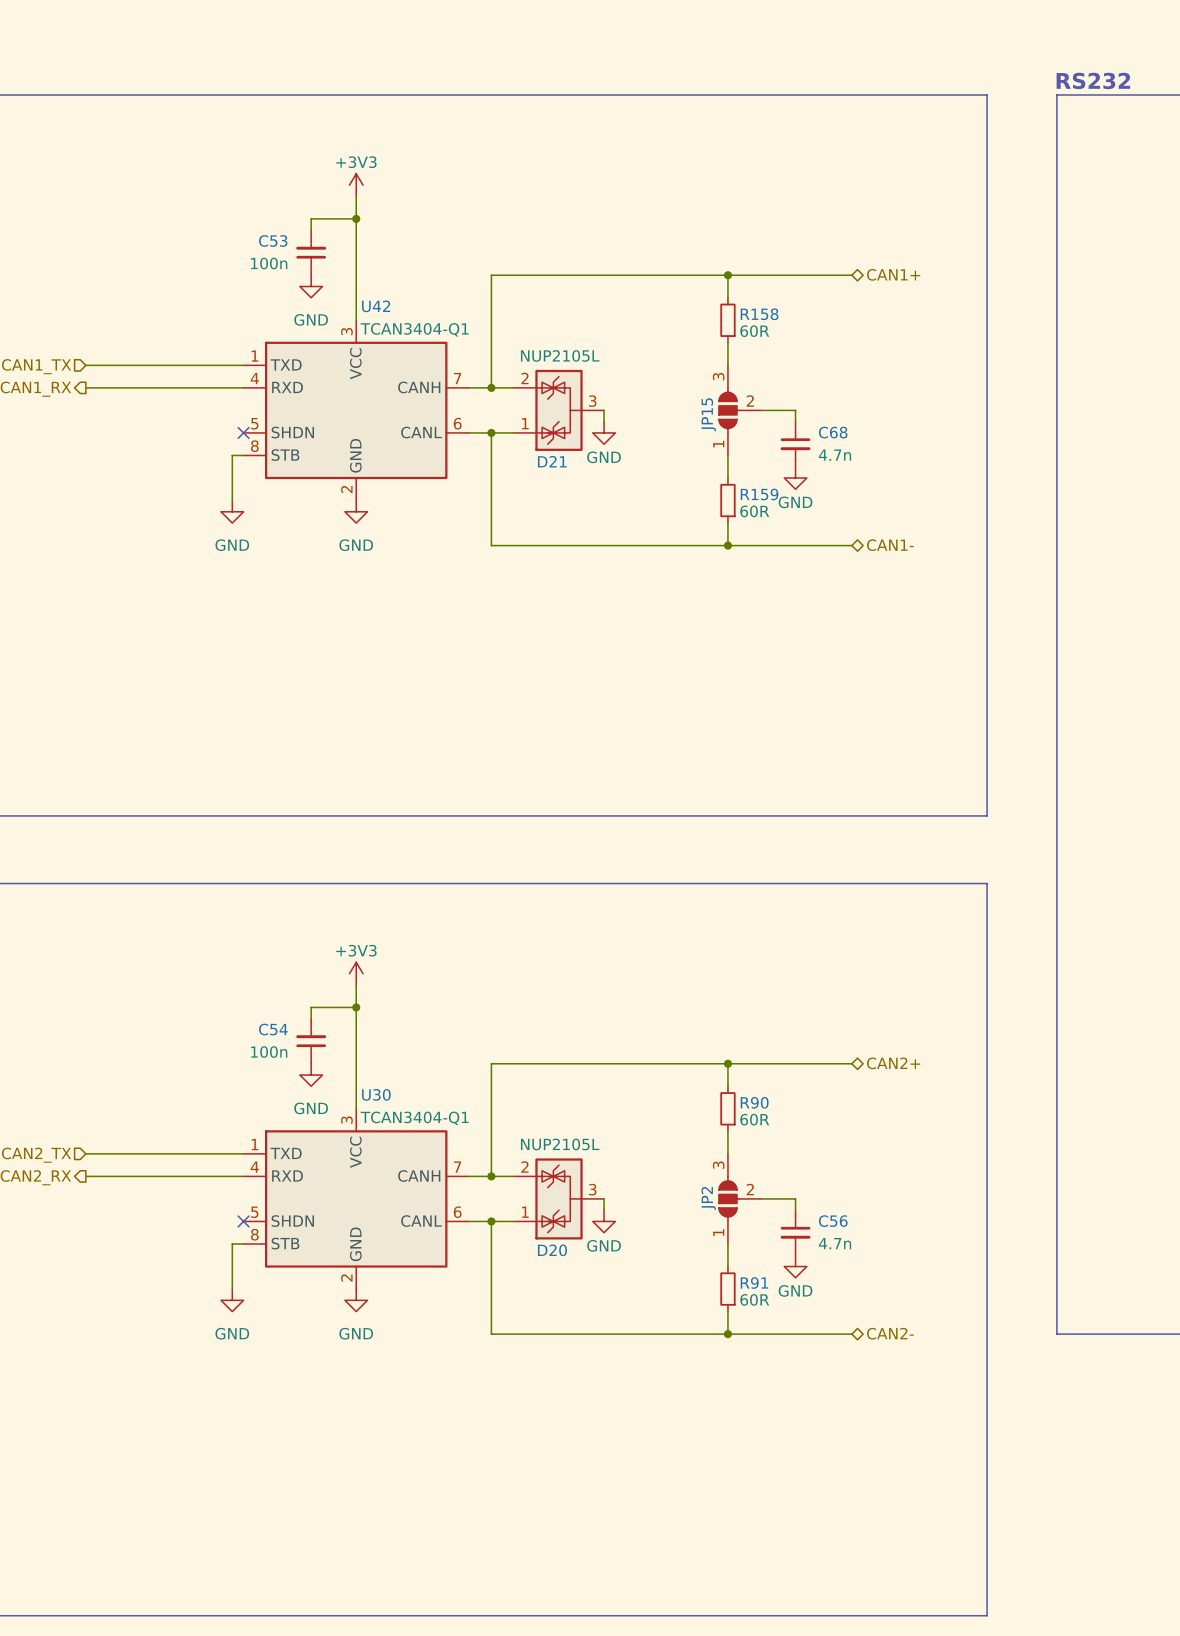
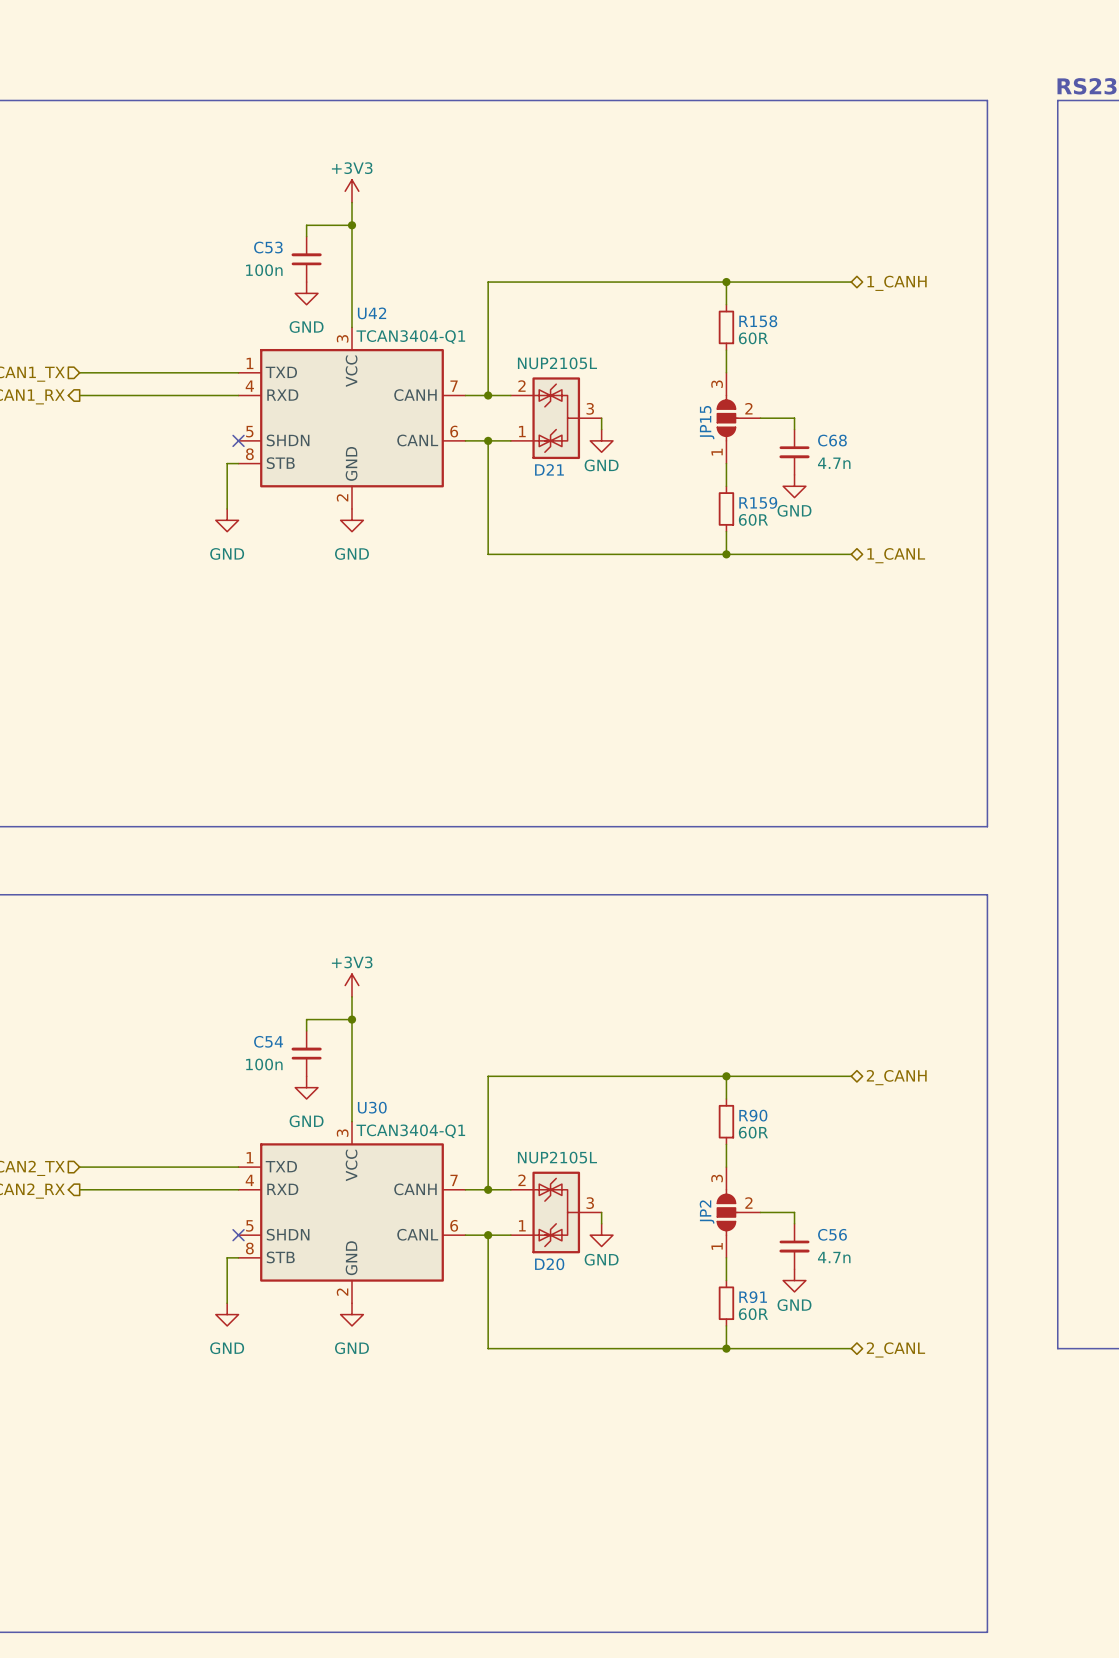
hierarchical label: CAN1+ (893, 274) -> 1_CANH (897, 283)
hierarchical label: CAN1- (890, 545) -> 1_CANL (896, 555)
hierarchical label: CAN2+ (893, 1063) -> 2_CANH (896, 1077)
hierarchical label: CAN2- (890, 1333) -> 2_CANL (895, 1349)

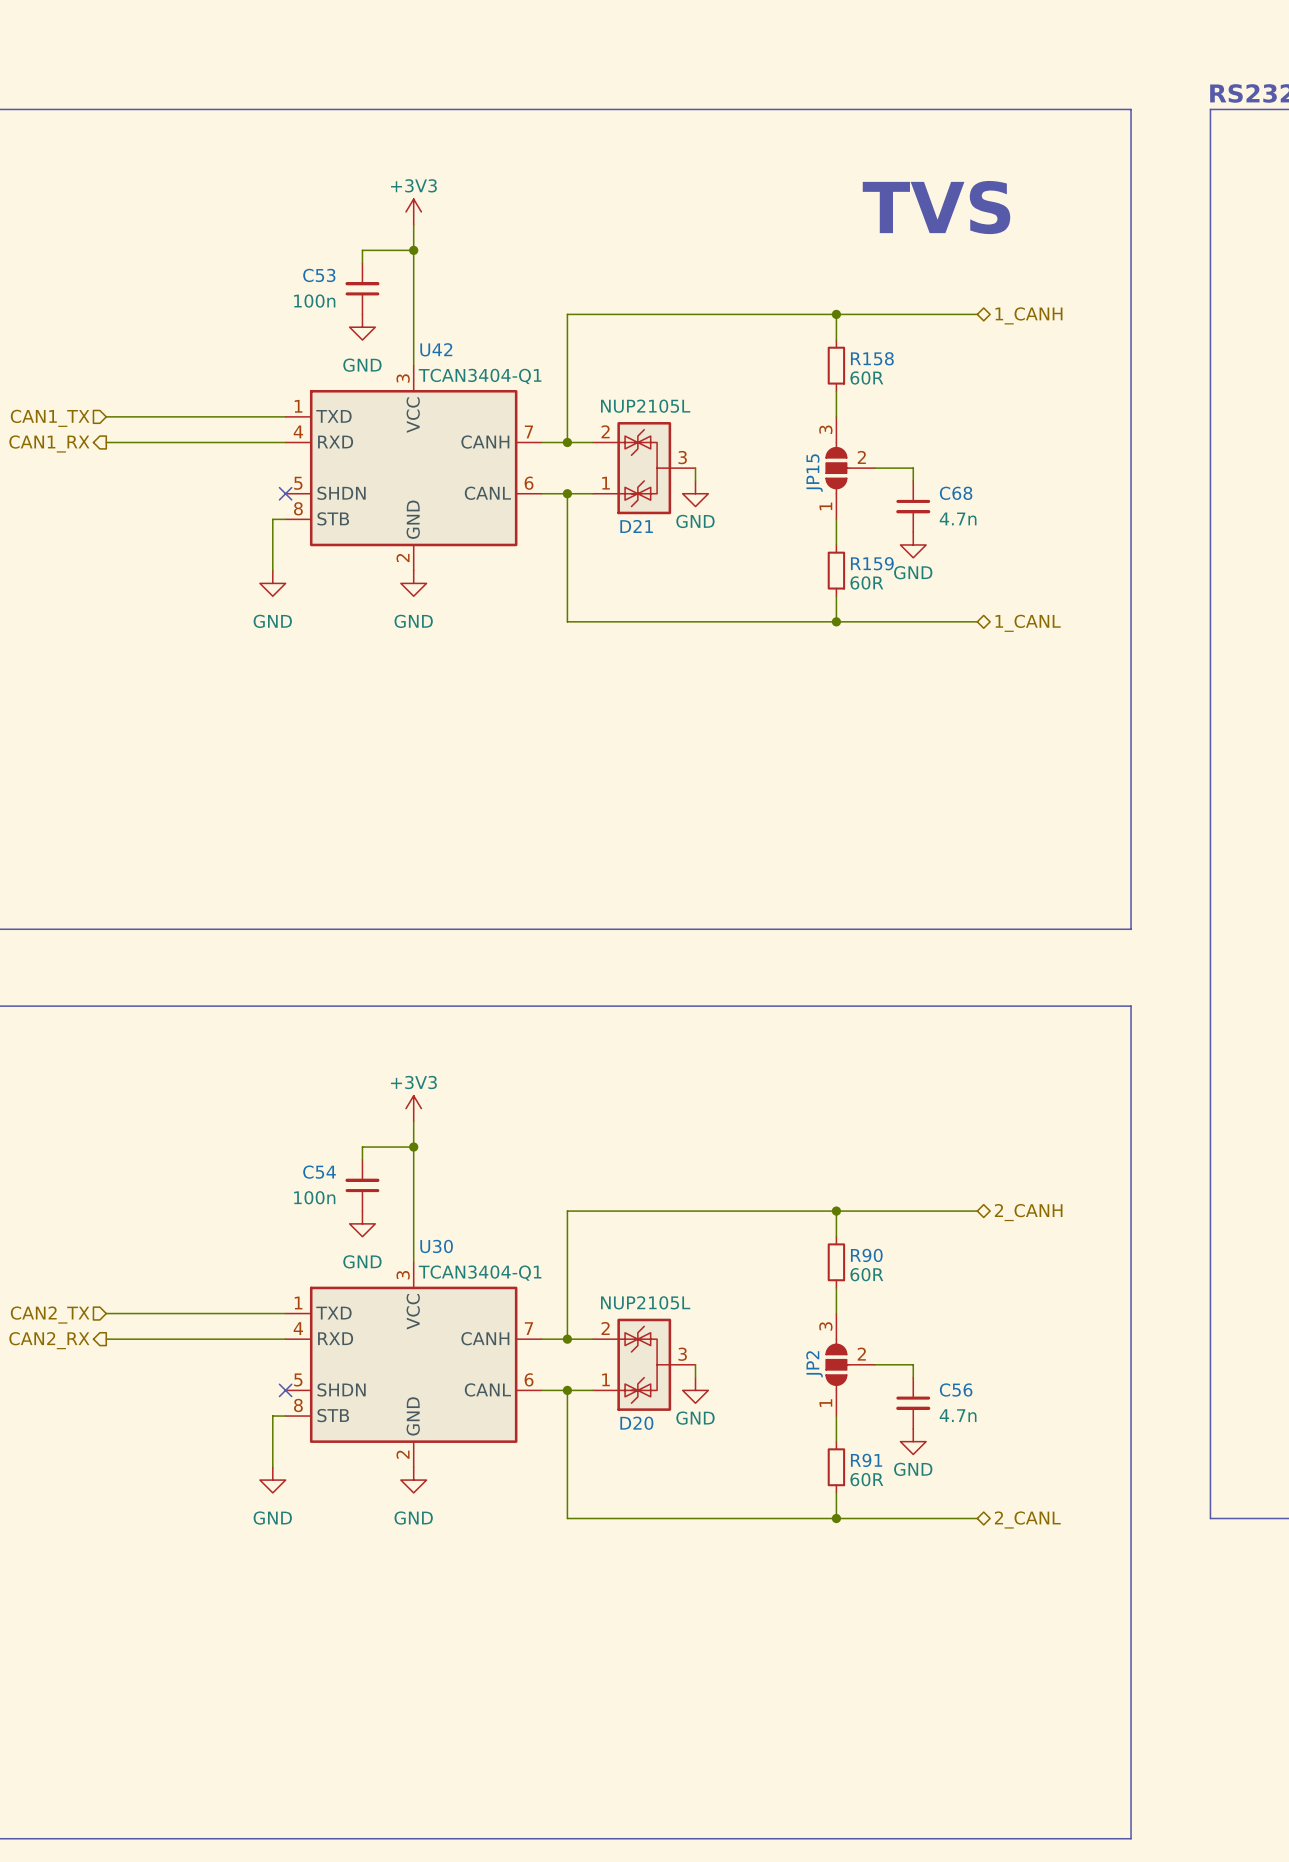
text: none -> TVS (936, 207)

